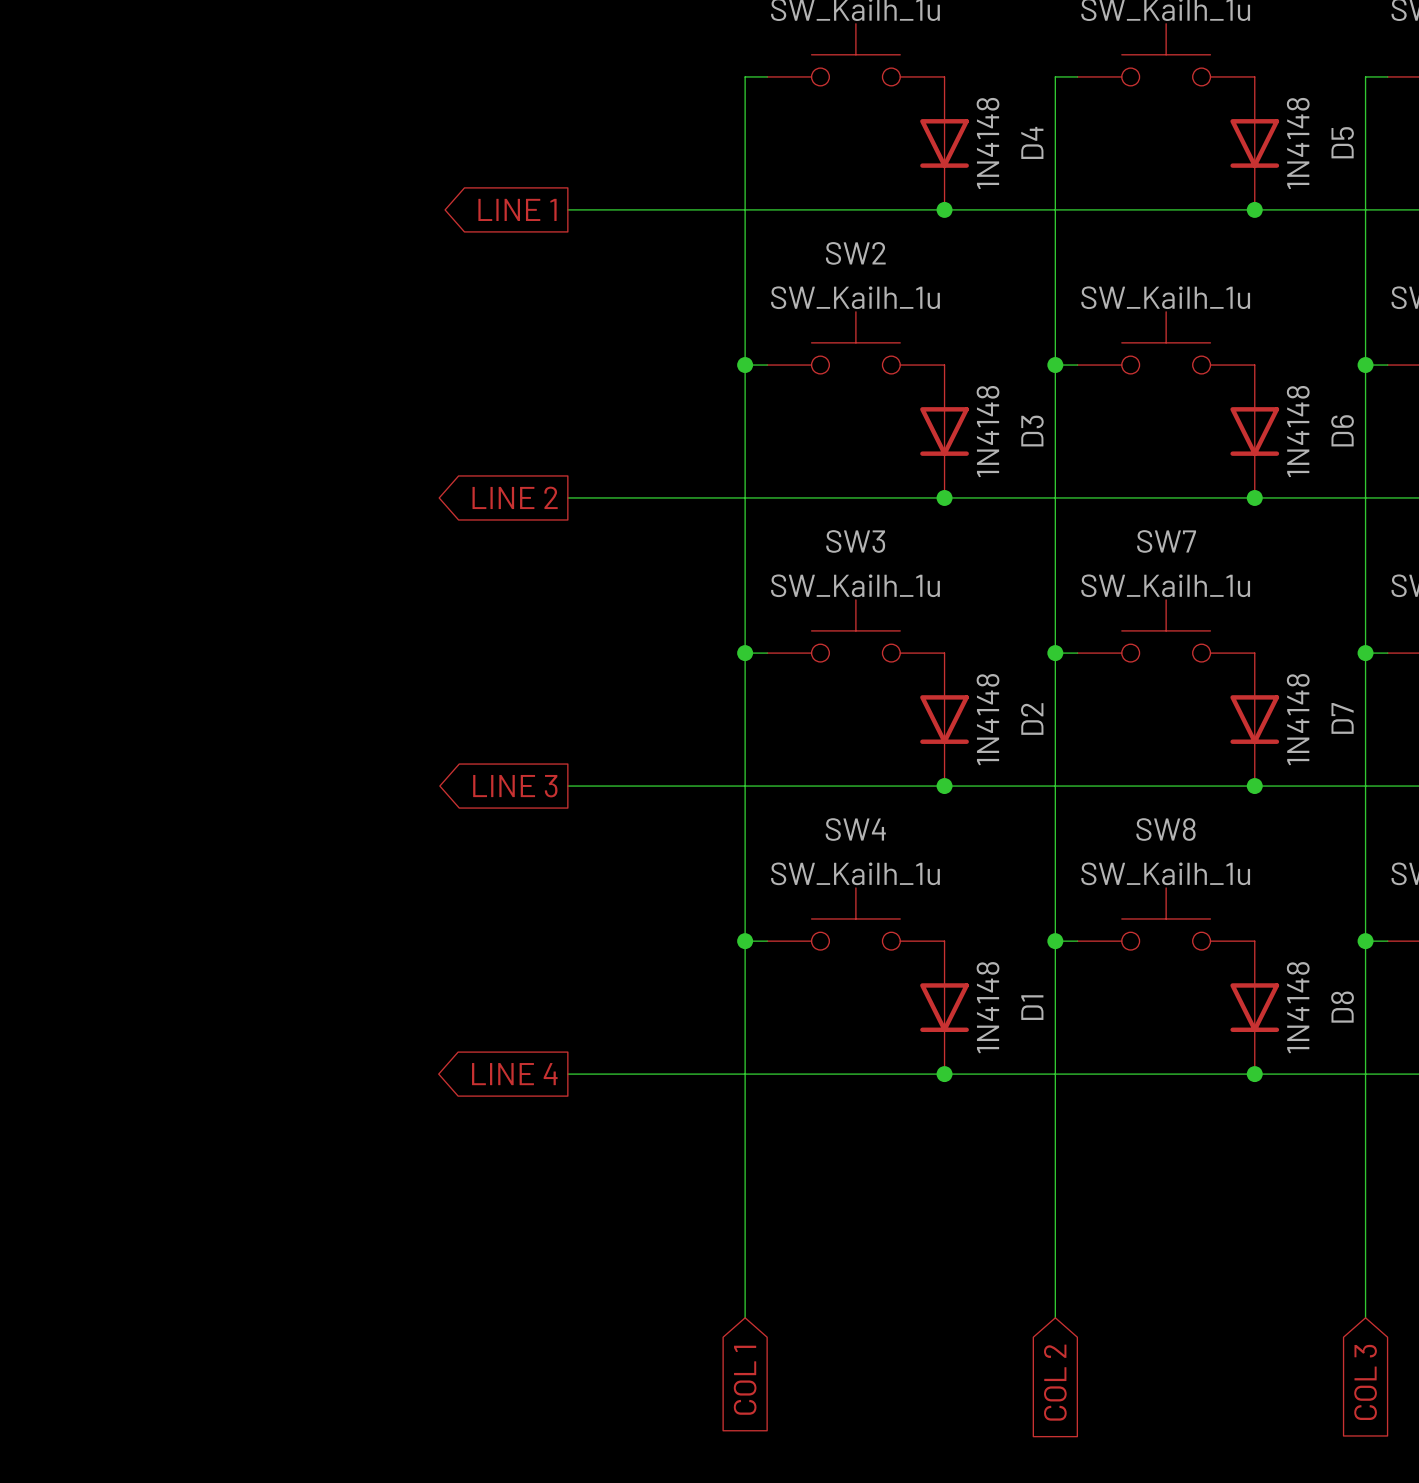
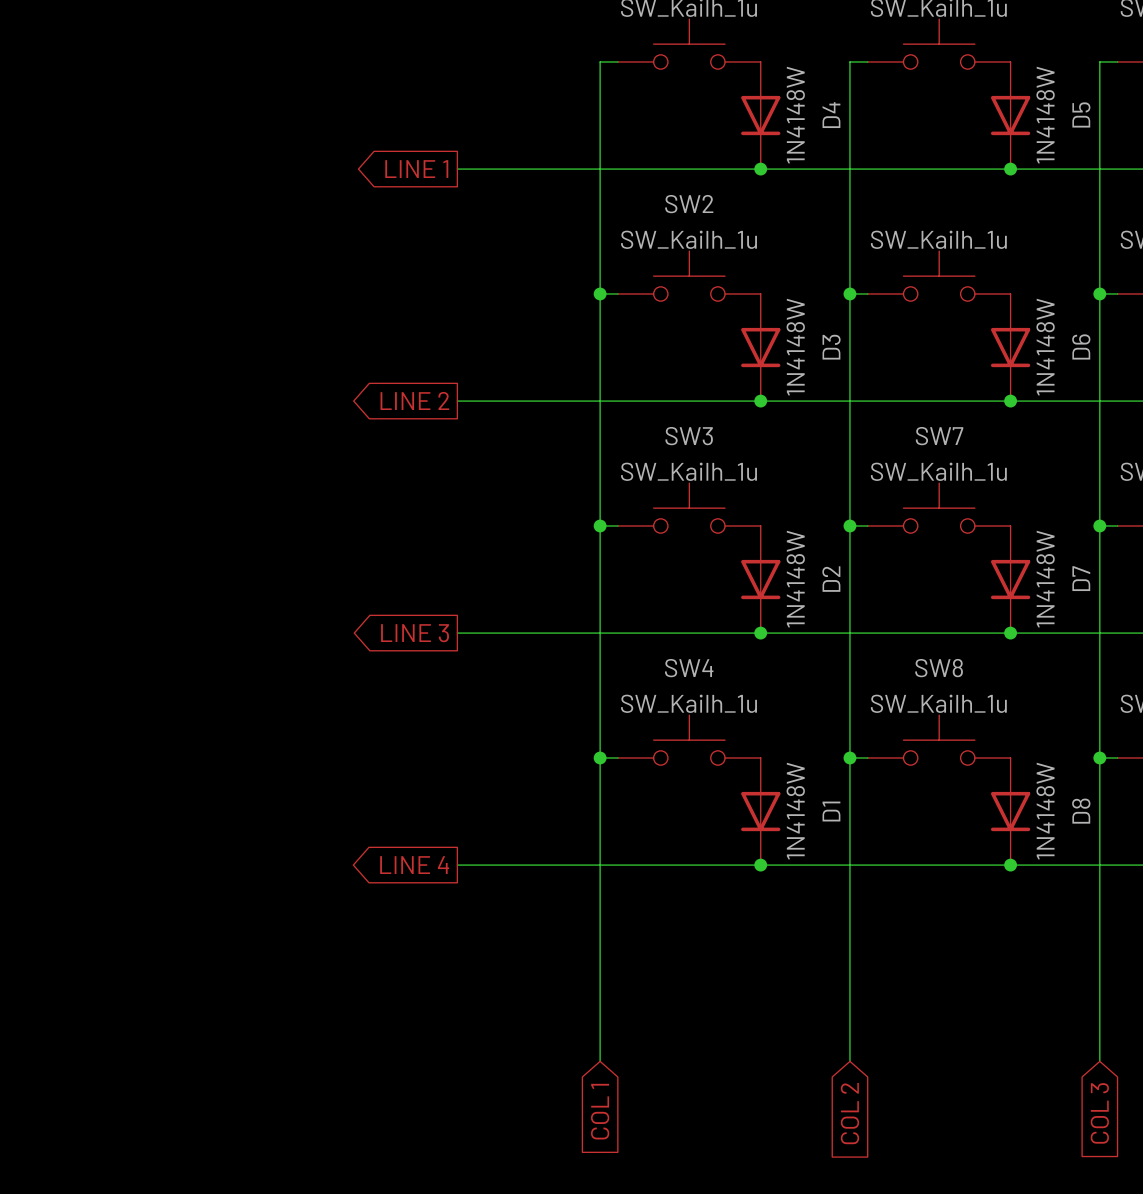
D4 value: 1N4148 (988, 143) -> 1N4148W (795, 115)
D5 value: 1N4148 (1298, 143) -> 1N4148W (1045, 115)
D3 value: 1N4148 (988, 431) -> 1N4148W (795, 347)
D6 value: 1N4148 (1298, 431) -> 1N4148W (1045, 347)
D2 value: 1N4148 (988, 719) -> 1N4148W (795, 579)
D7 value: 1N4148 (1298, 719) -> 1N4148W (1045, 579)
D1 value: 1N4148 (988, 1007) -> 1N4148W (795, 811)
D8 value: 1N4148 (1298, 1007) -> 1N4148W (1045, 811)

